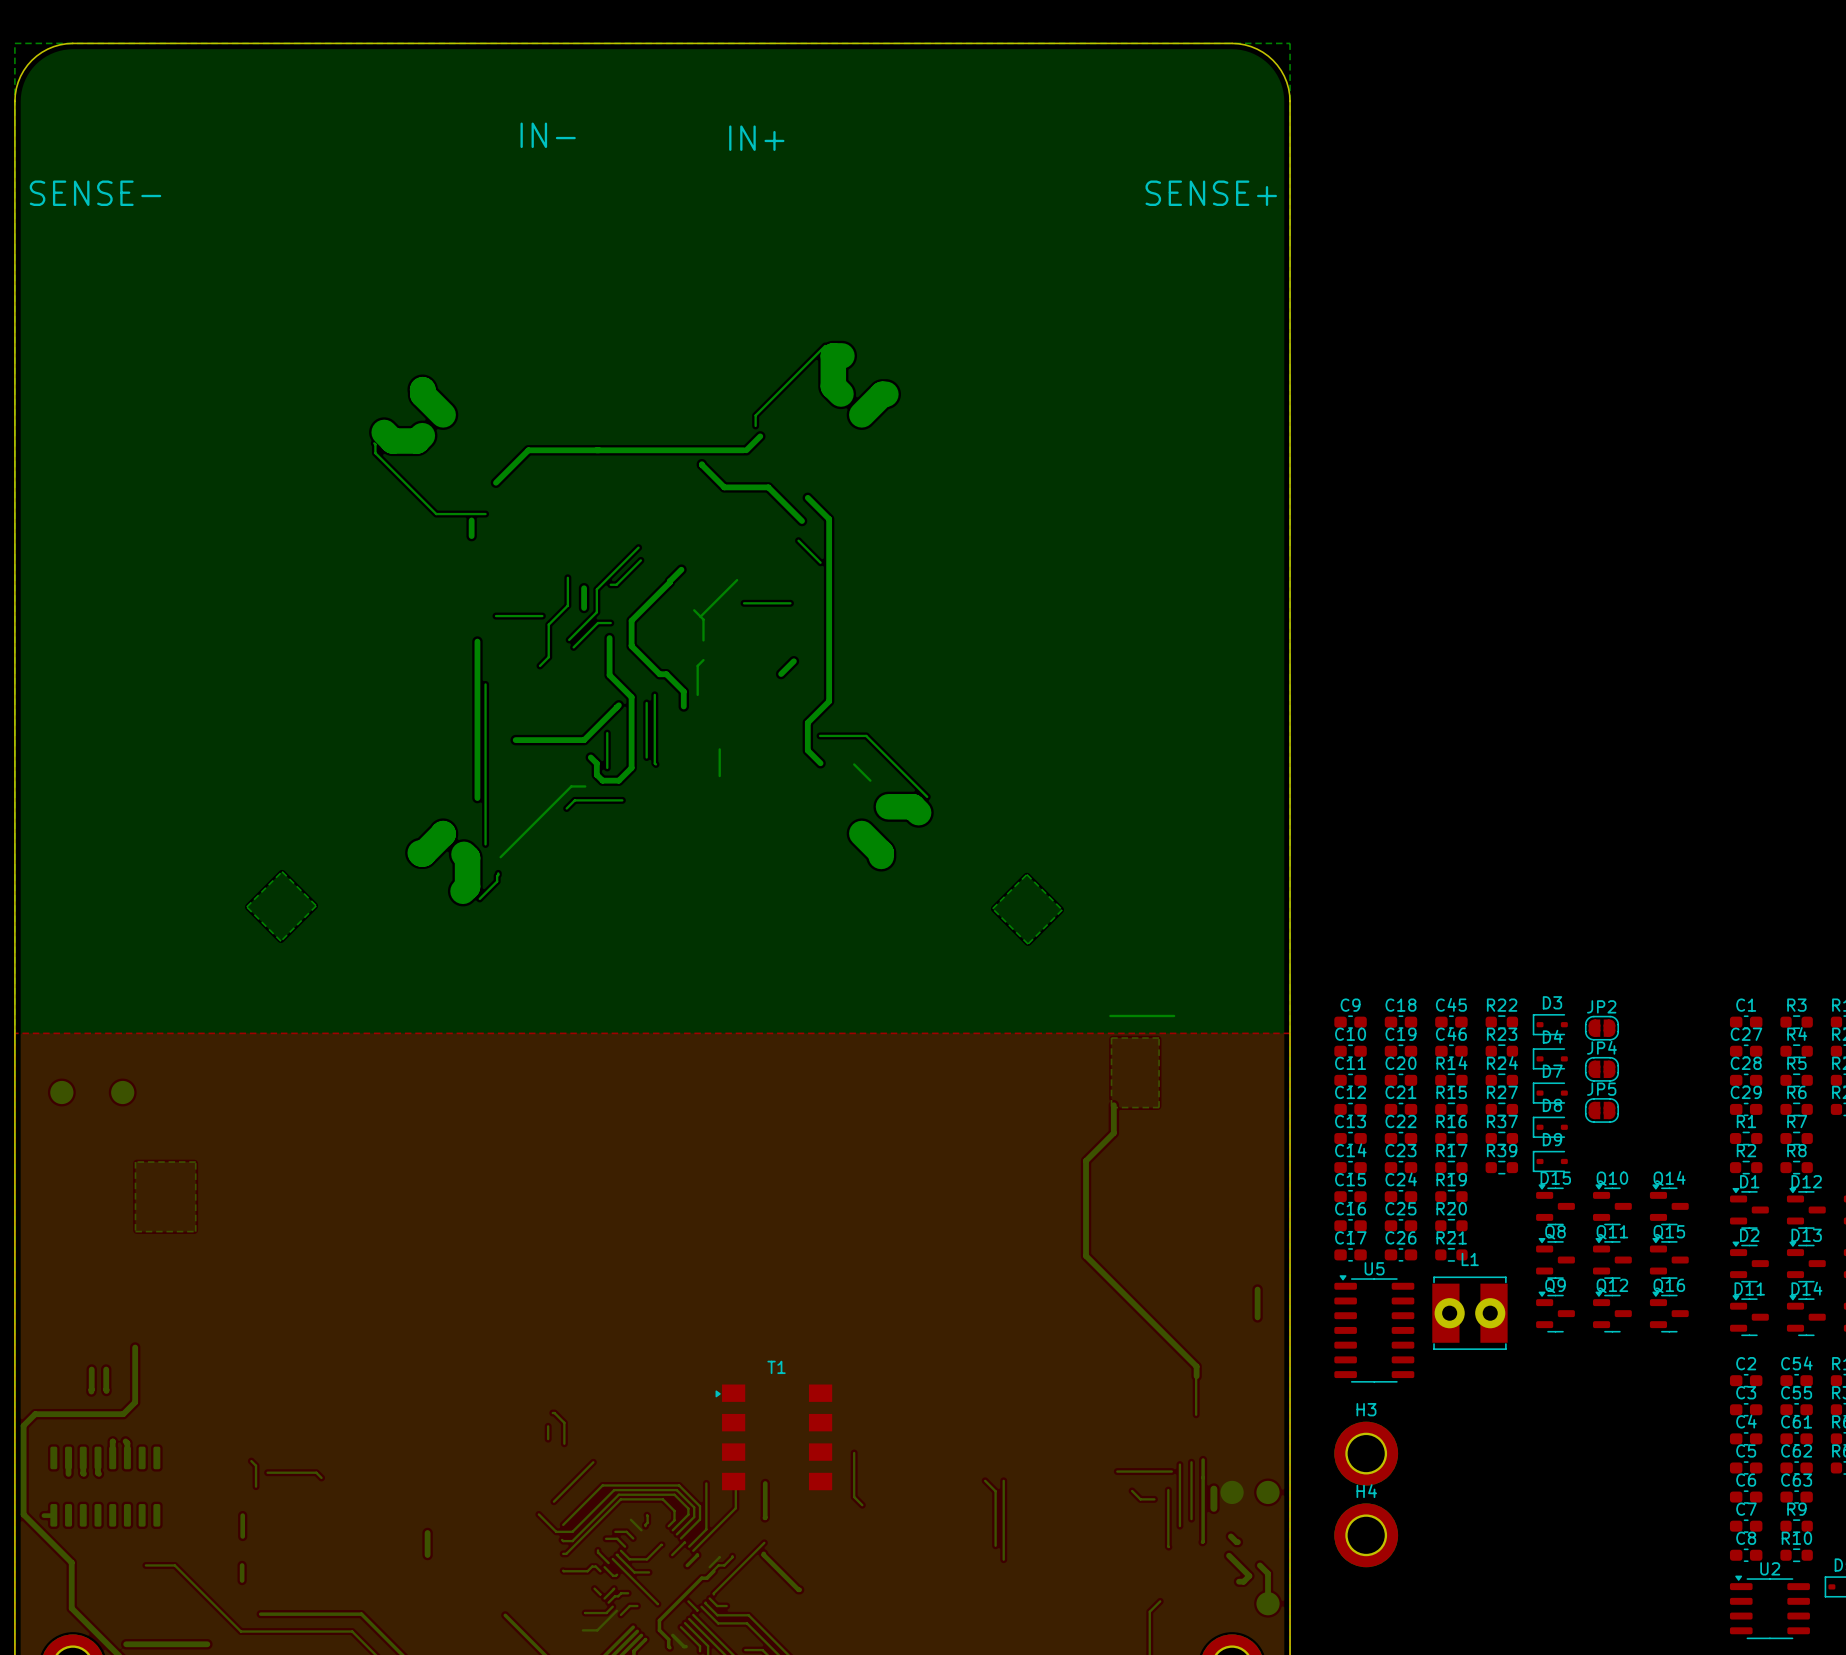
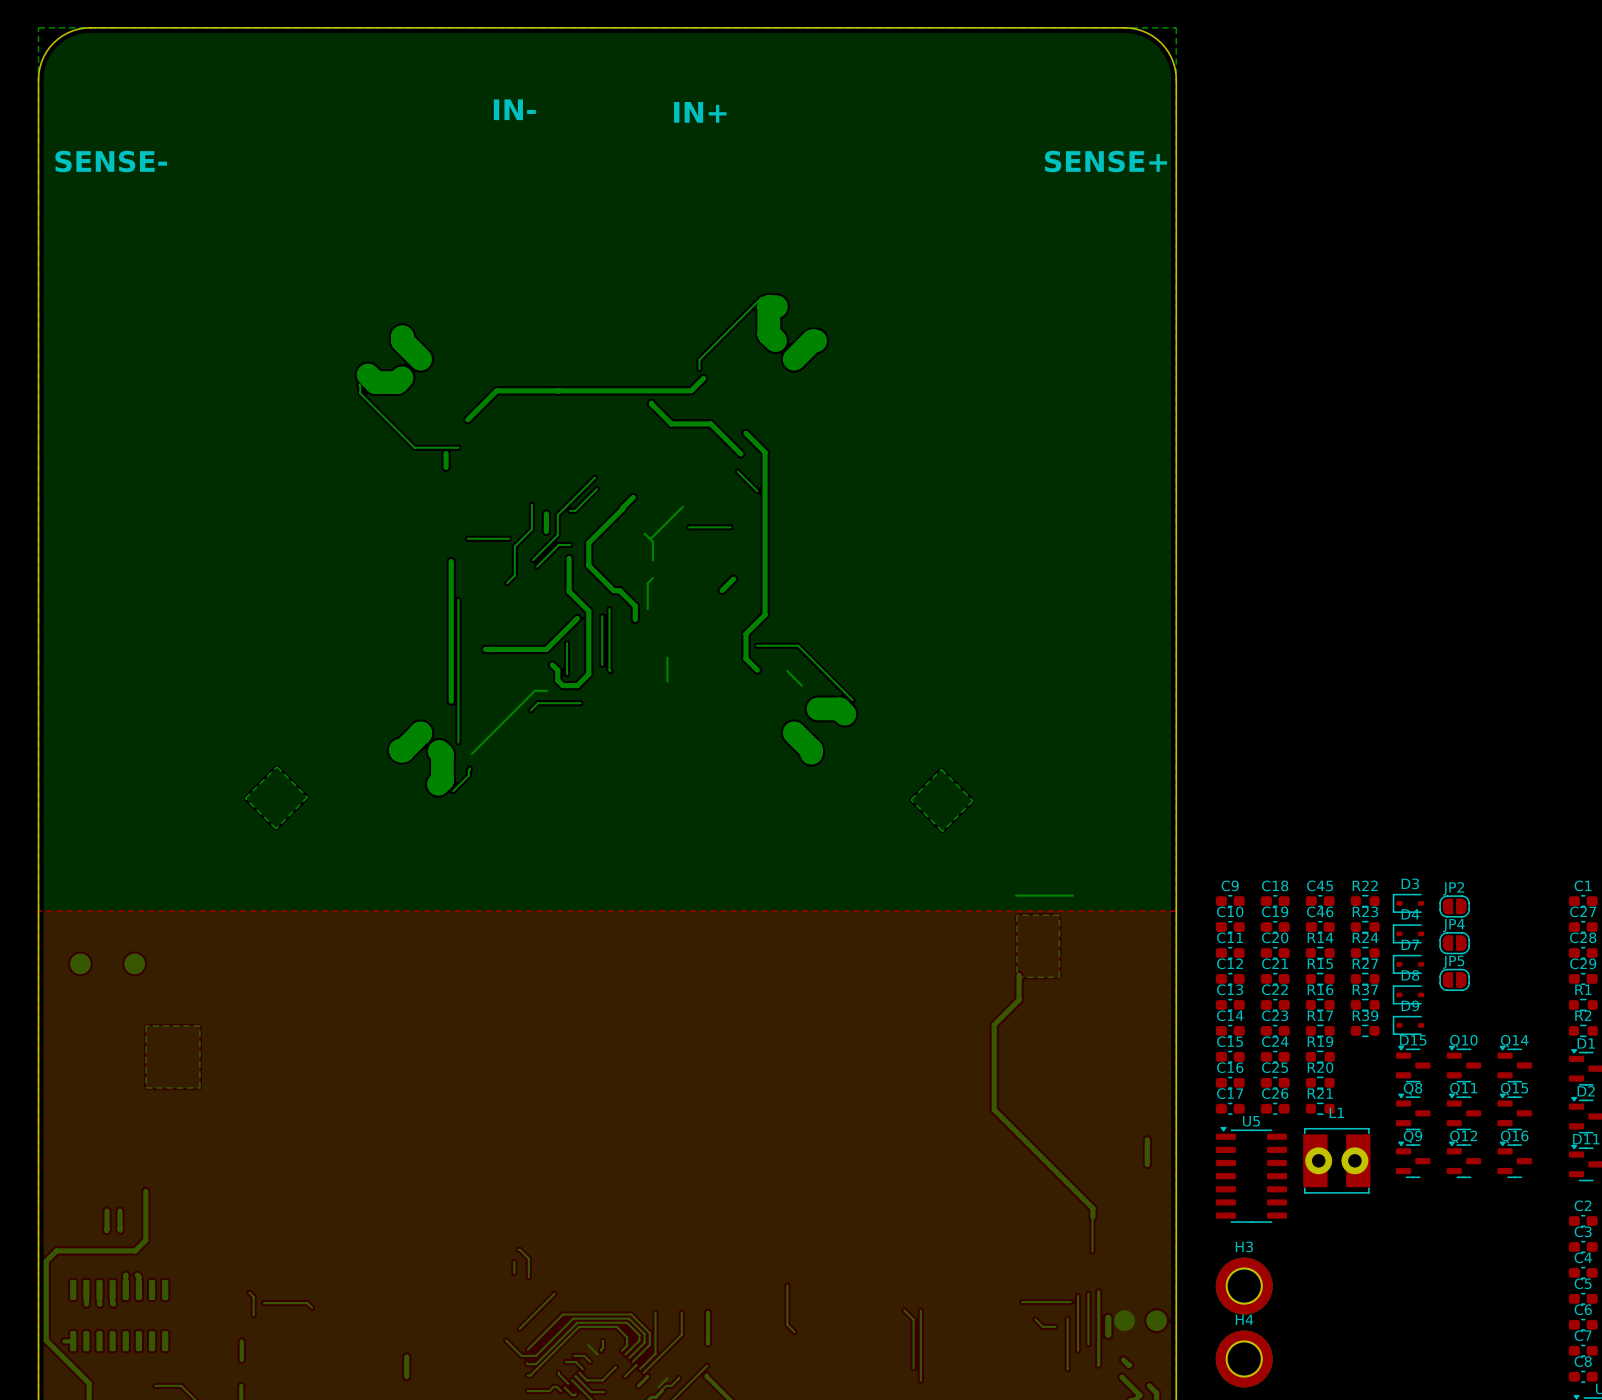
T1: (773, 1437) -> none

